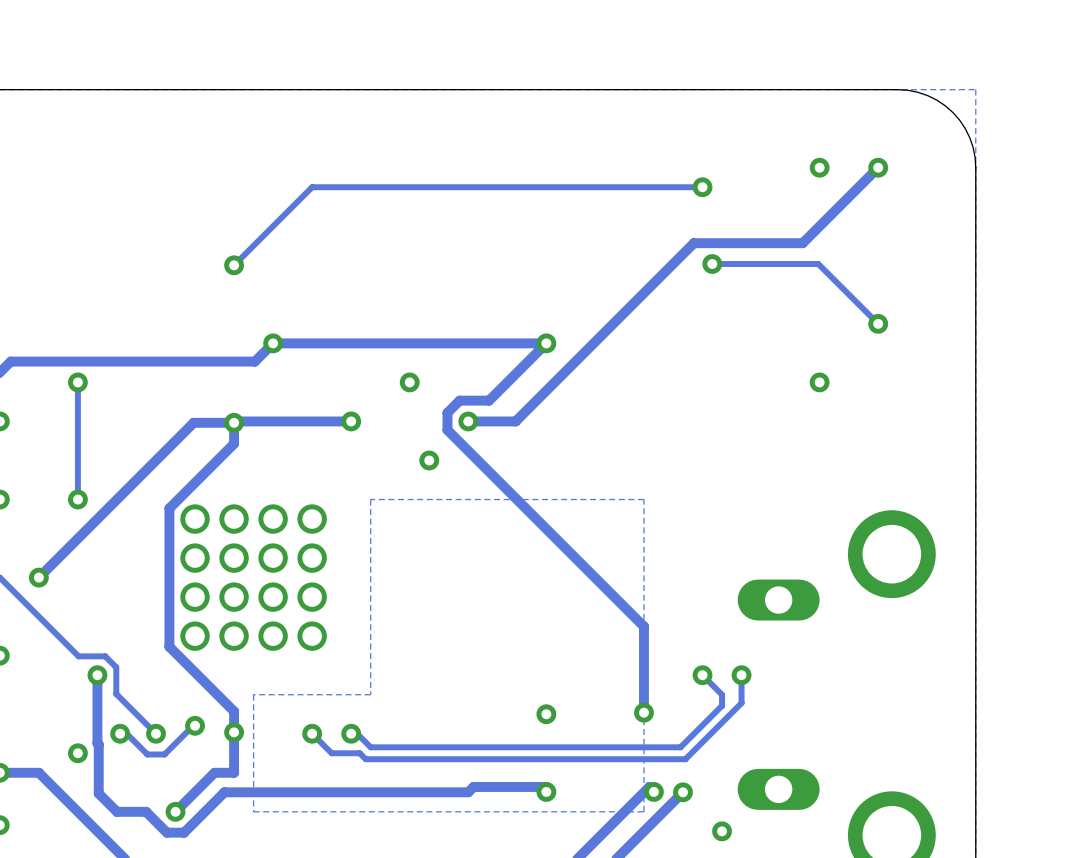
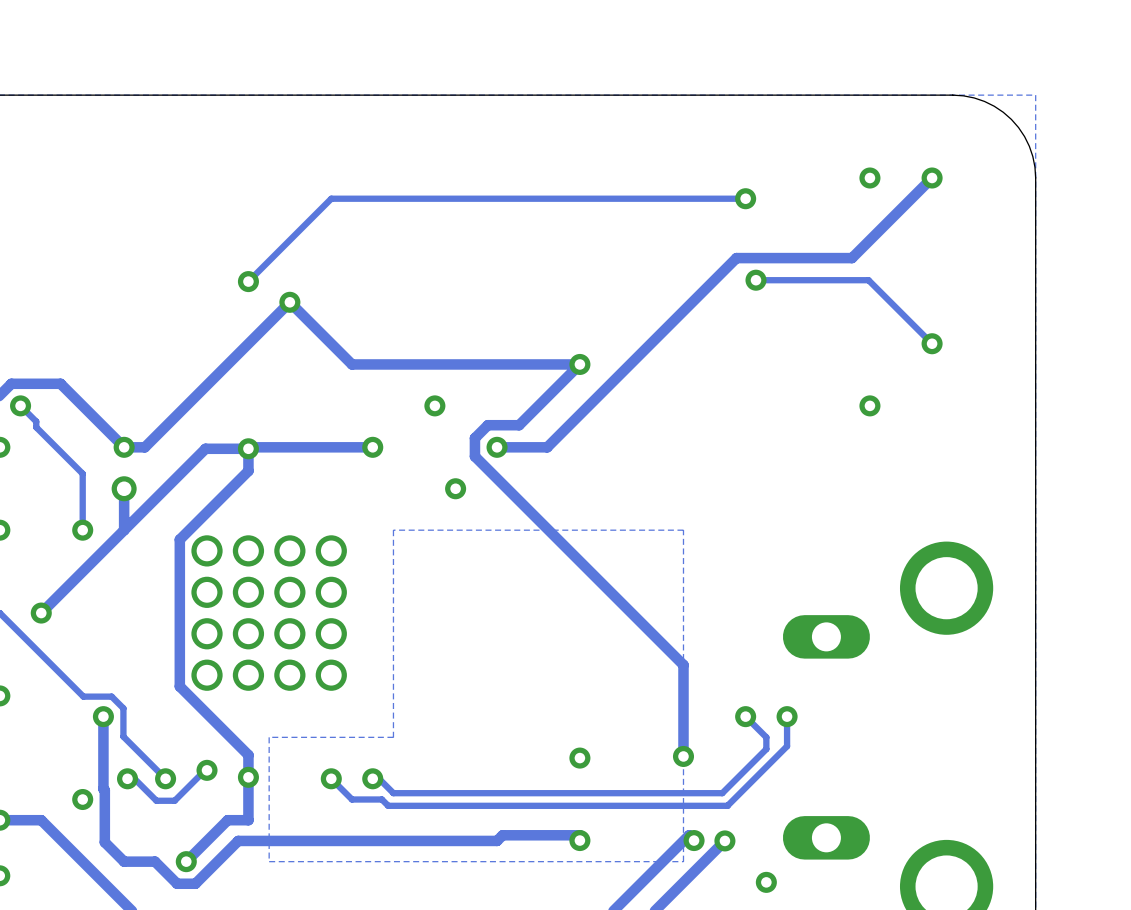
via position: (273, 343) -> (289, 302)
track: (331, 343) (273, 343) (254, 361) (57, 361) -> (352, 364) (289, 302) (144, 447) (124, 447) (60, 383)
via: none -> (20, 405)
track: (77, 382) (77, 446) -> (20, 405) (36, 421) (36, 427) (82, 473)
via: (77, 382) -> none
via: none -> (124, 447)
track: none -> (124, 488) (124, 530)
via: none -> (124, 488)

